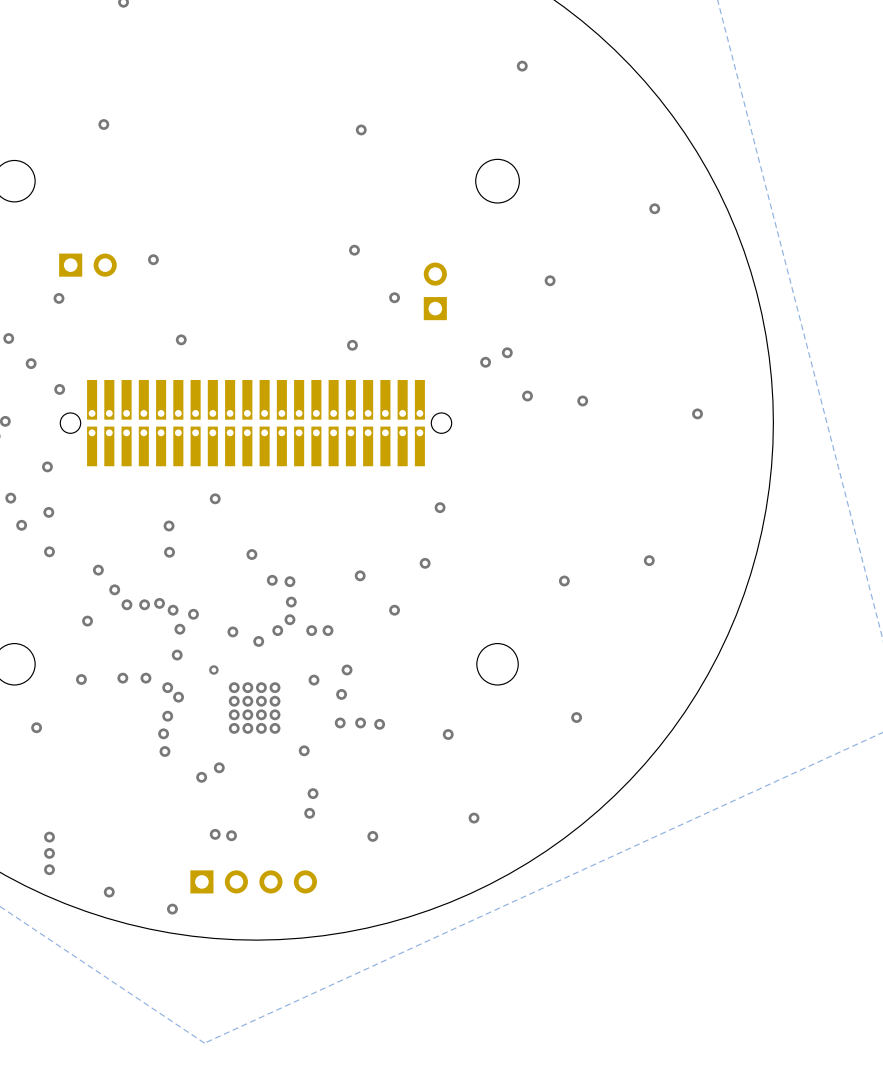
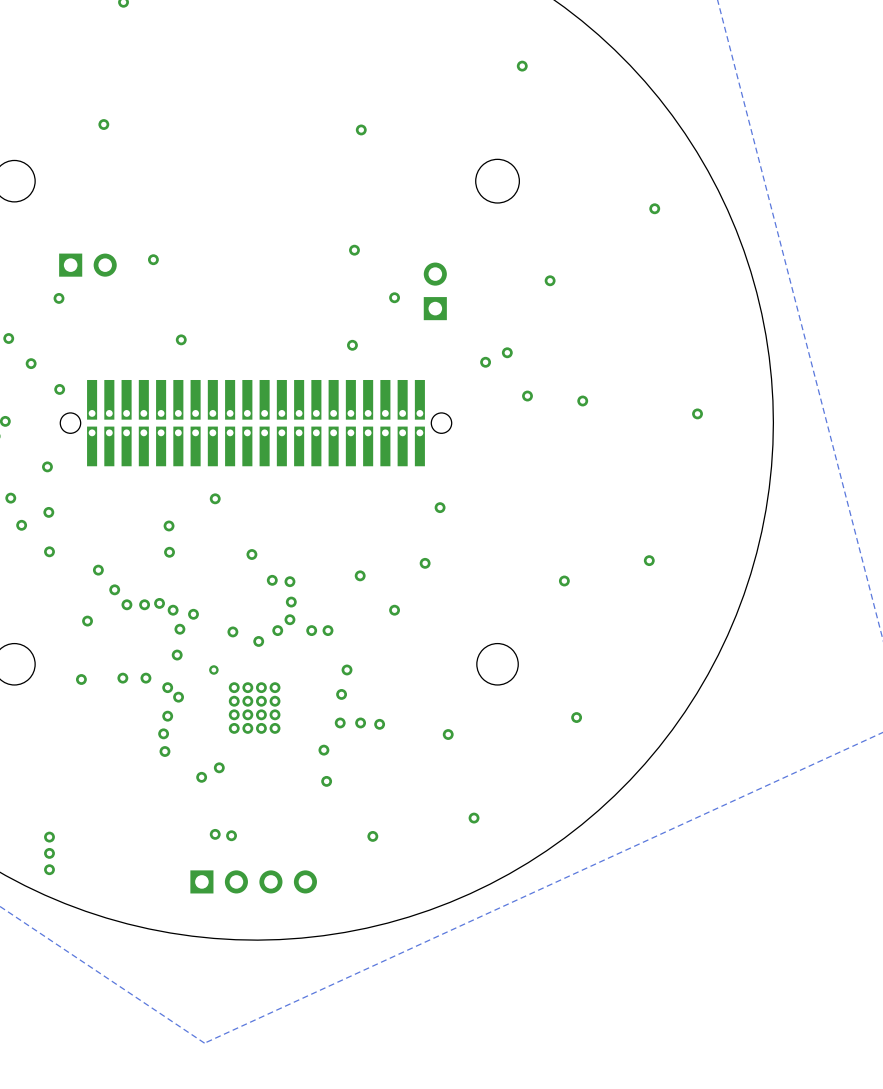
via: (314, 680) -> none
via: (36, 727) -> none
via: (304, 750) -> none
via: none -> (323, 750)
via: none -> (326, 781)
via: (313, 793) -> none
via: (309, 813) -> none
via: (109, 892) -> none
via: (172, 909) -> none

